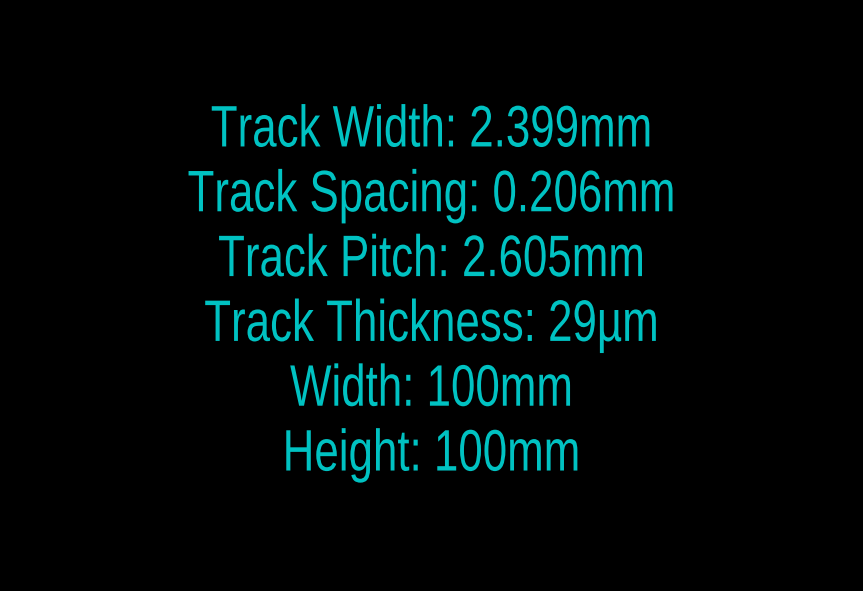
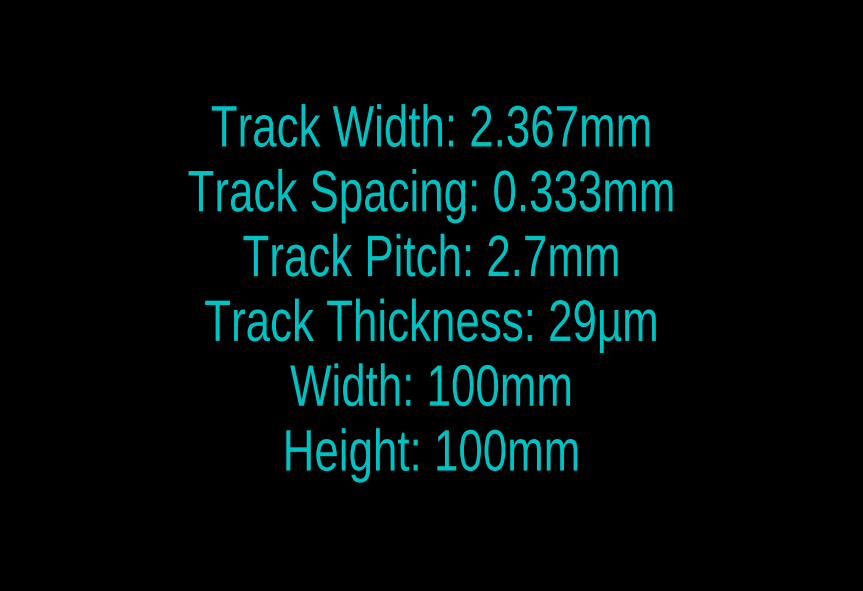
text: Track Width: 2.399mm (430, 125) -> Track Width: 2.367mm (430, 125)
text: Track Spacing: 0.206mm (430, 196) -> Track Spacing: 0.333mm (430, 196)
text: Track Pitch: 2.605mm (430, 255) -> Track Pitch: 2.7mm (430, 255)

